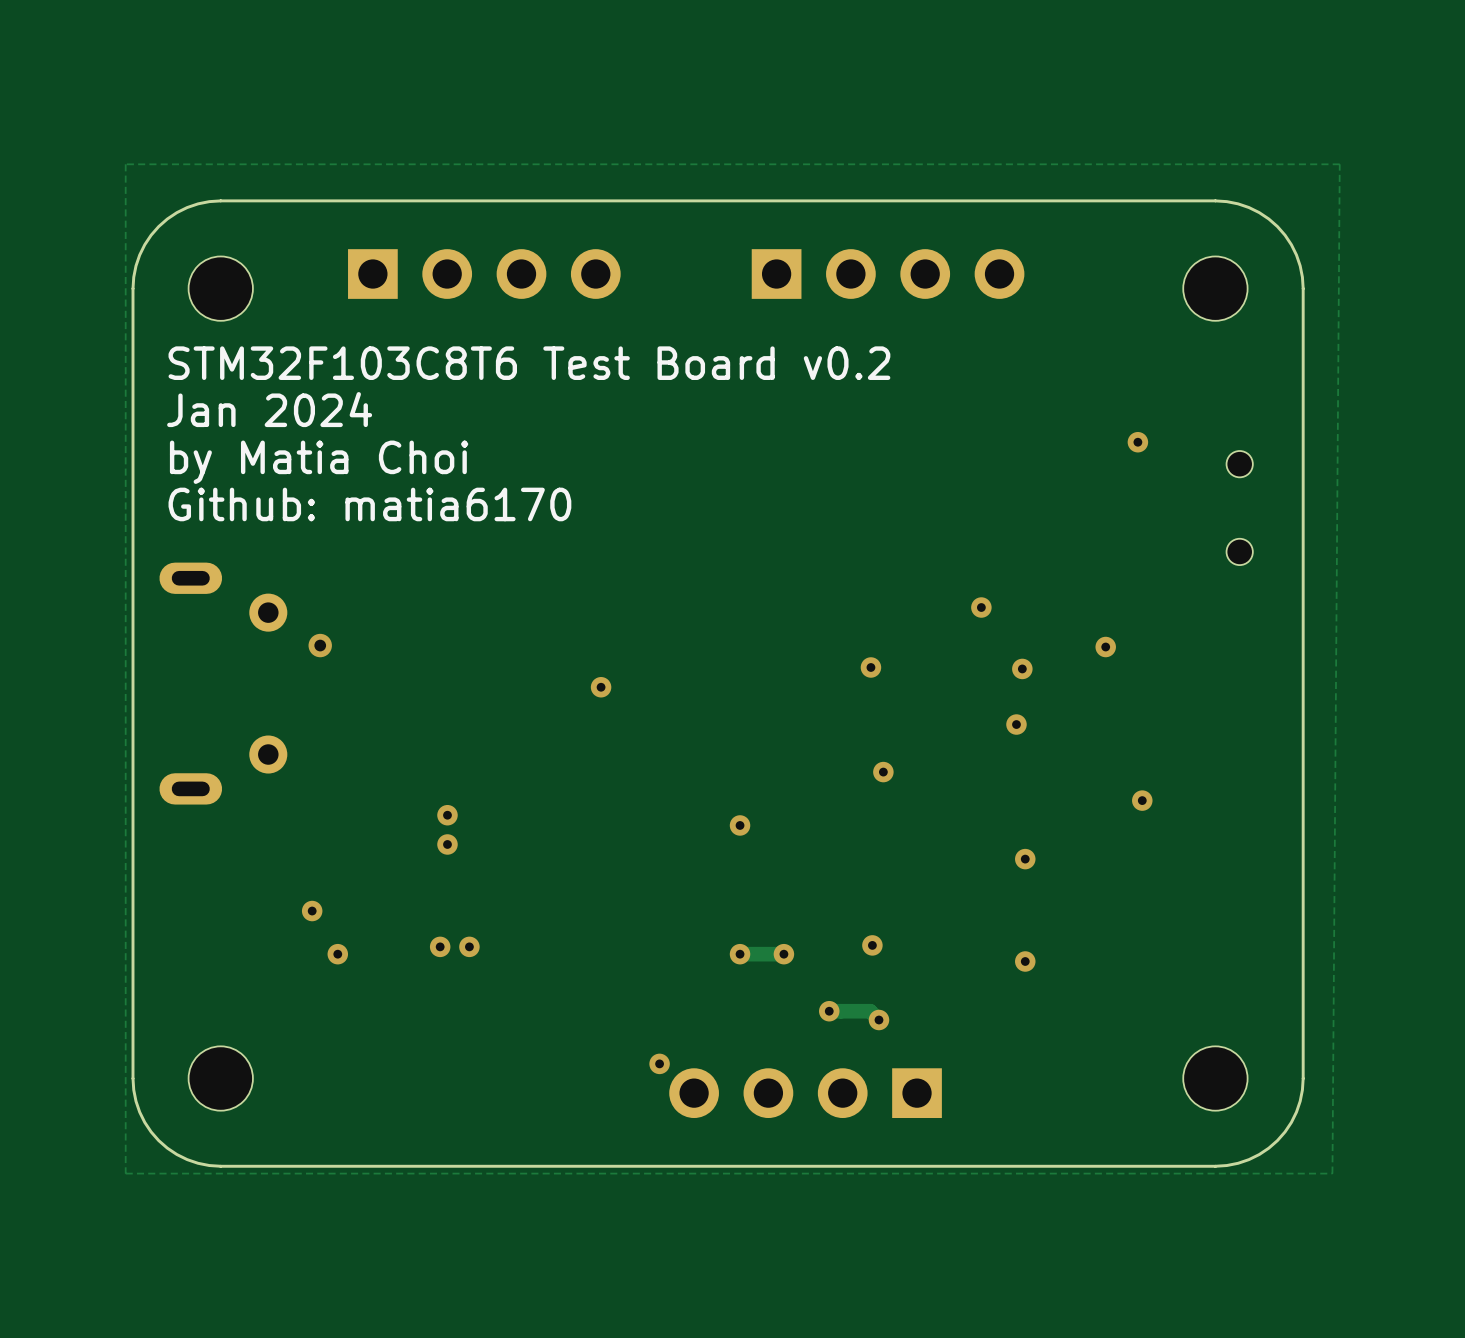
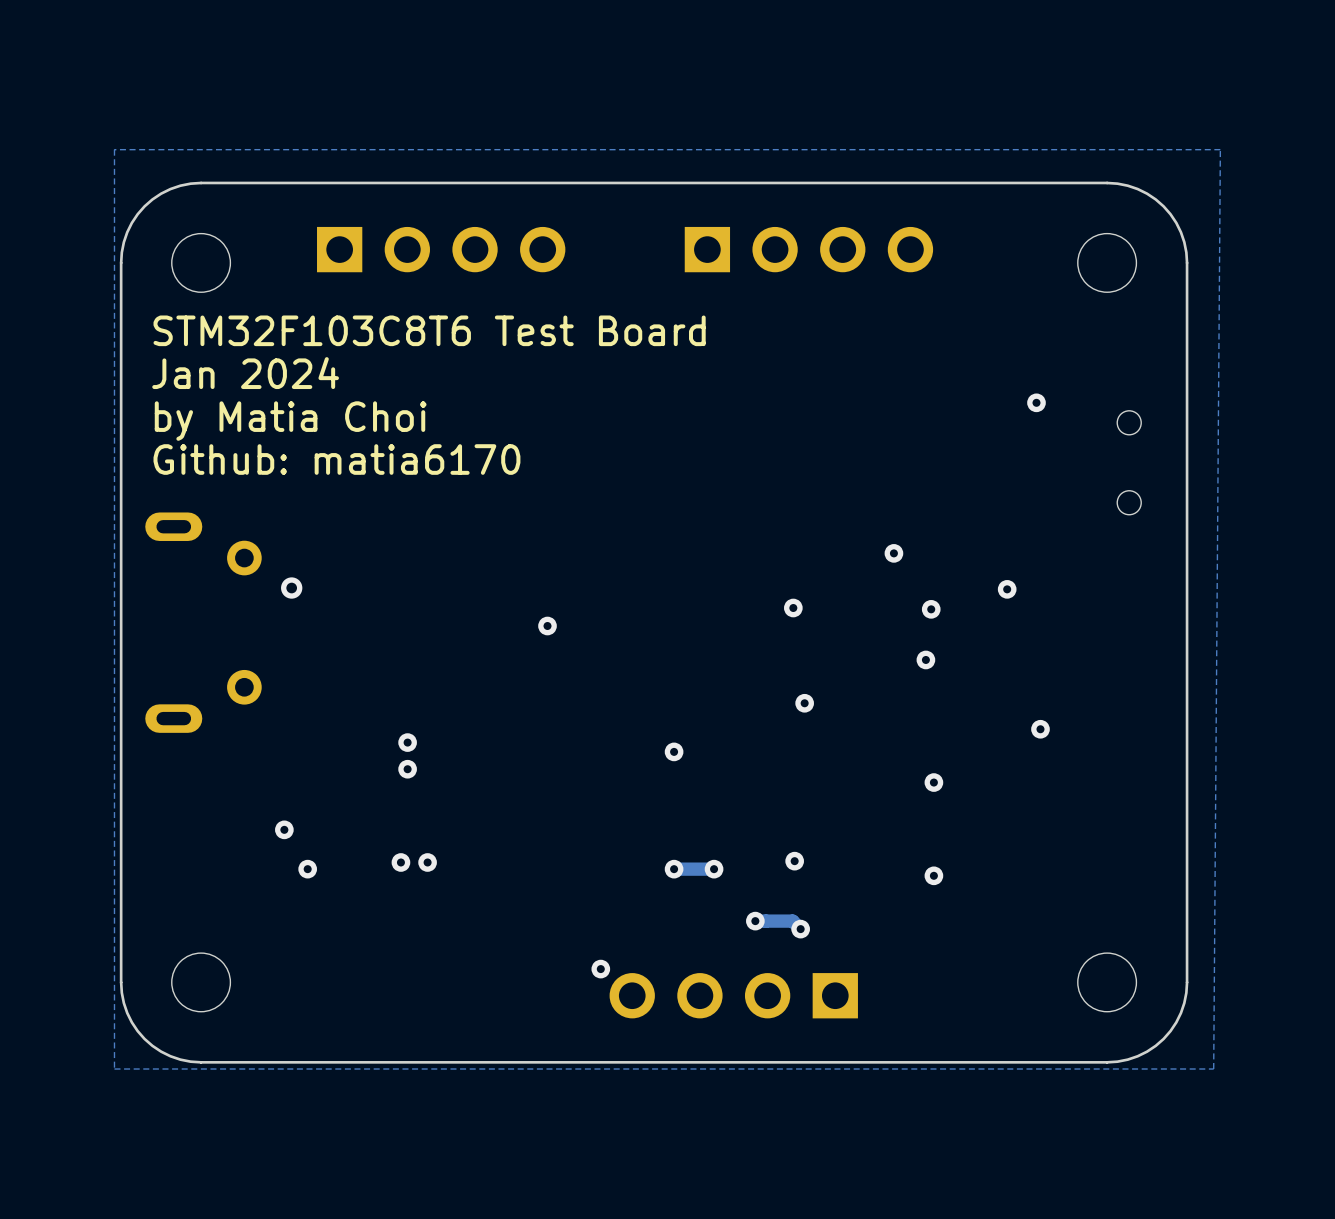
text: STM32F103C8T6 Test Board v0.2 (529, 363) -> STM32F103C8T6 Test Board (429, 330)

